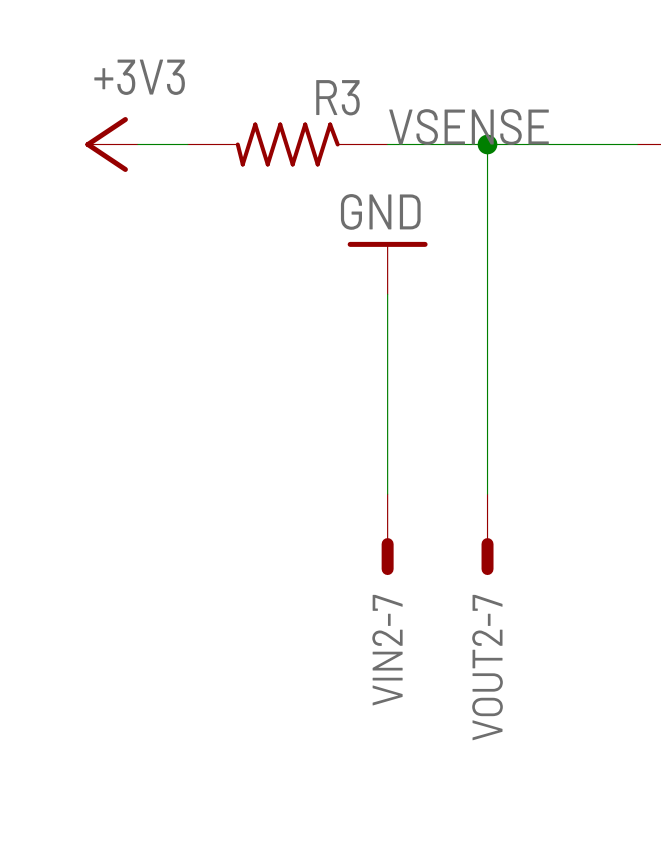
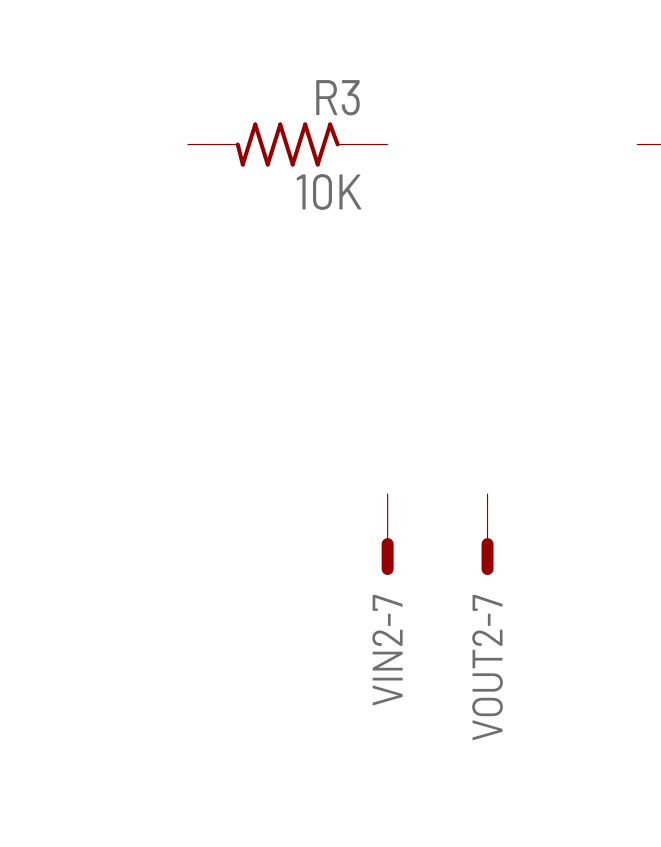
label: VSENSE (468, 127) -> none
power symbol: +3V3 (111, 144) -> none
wire: (137, 144) (187, 144) -> none
wire: (387, 144) (637, 144) -> none
wire: (487, 144) (487, 494) -> none
junction: (487, 144) -> none
R3 value: none -> 10K (329, 191)
power symbol: GND (387, 268) -> none
wire: (387, 294) (387, 494) -> none

